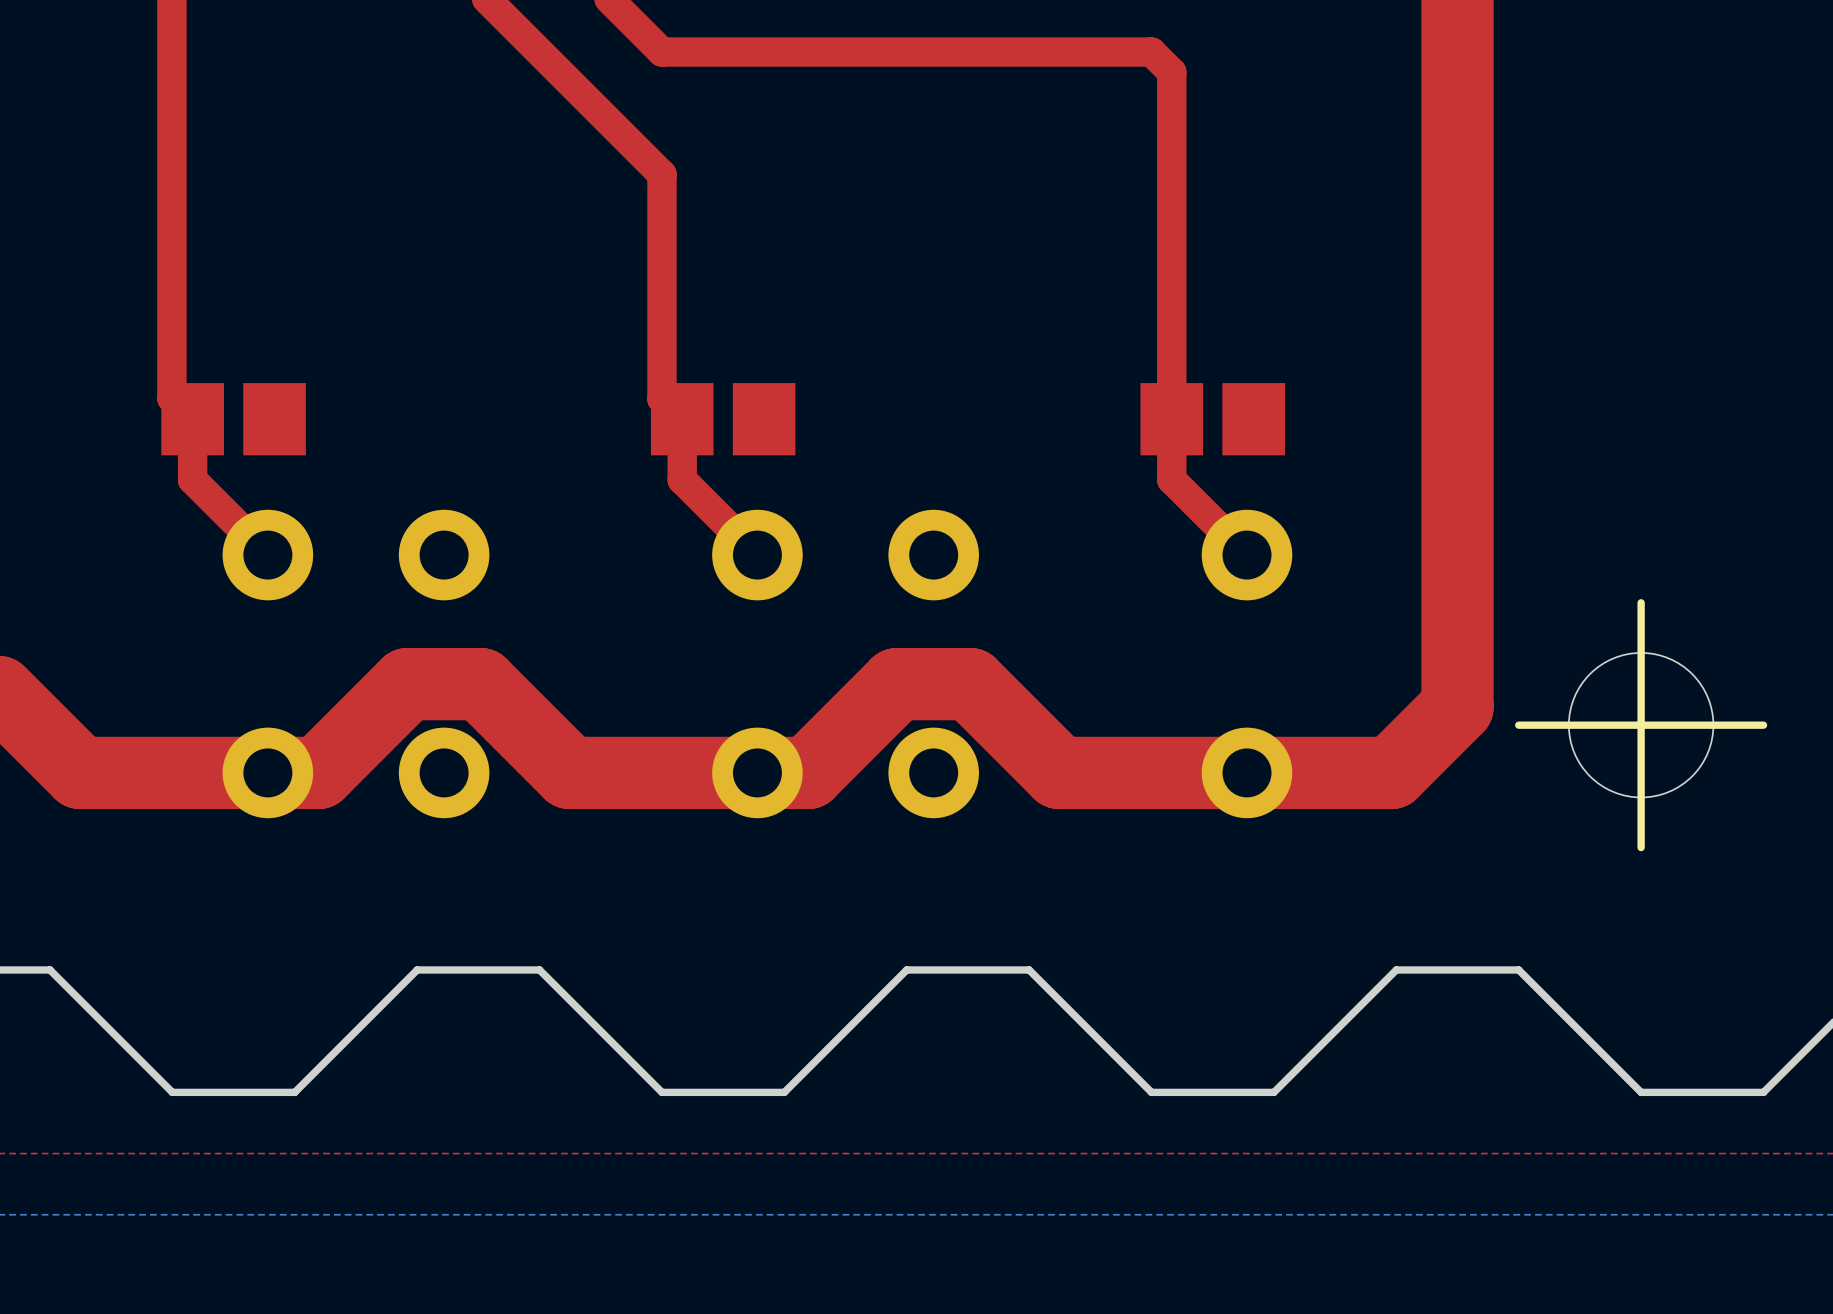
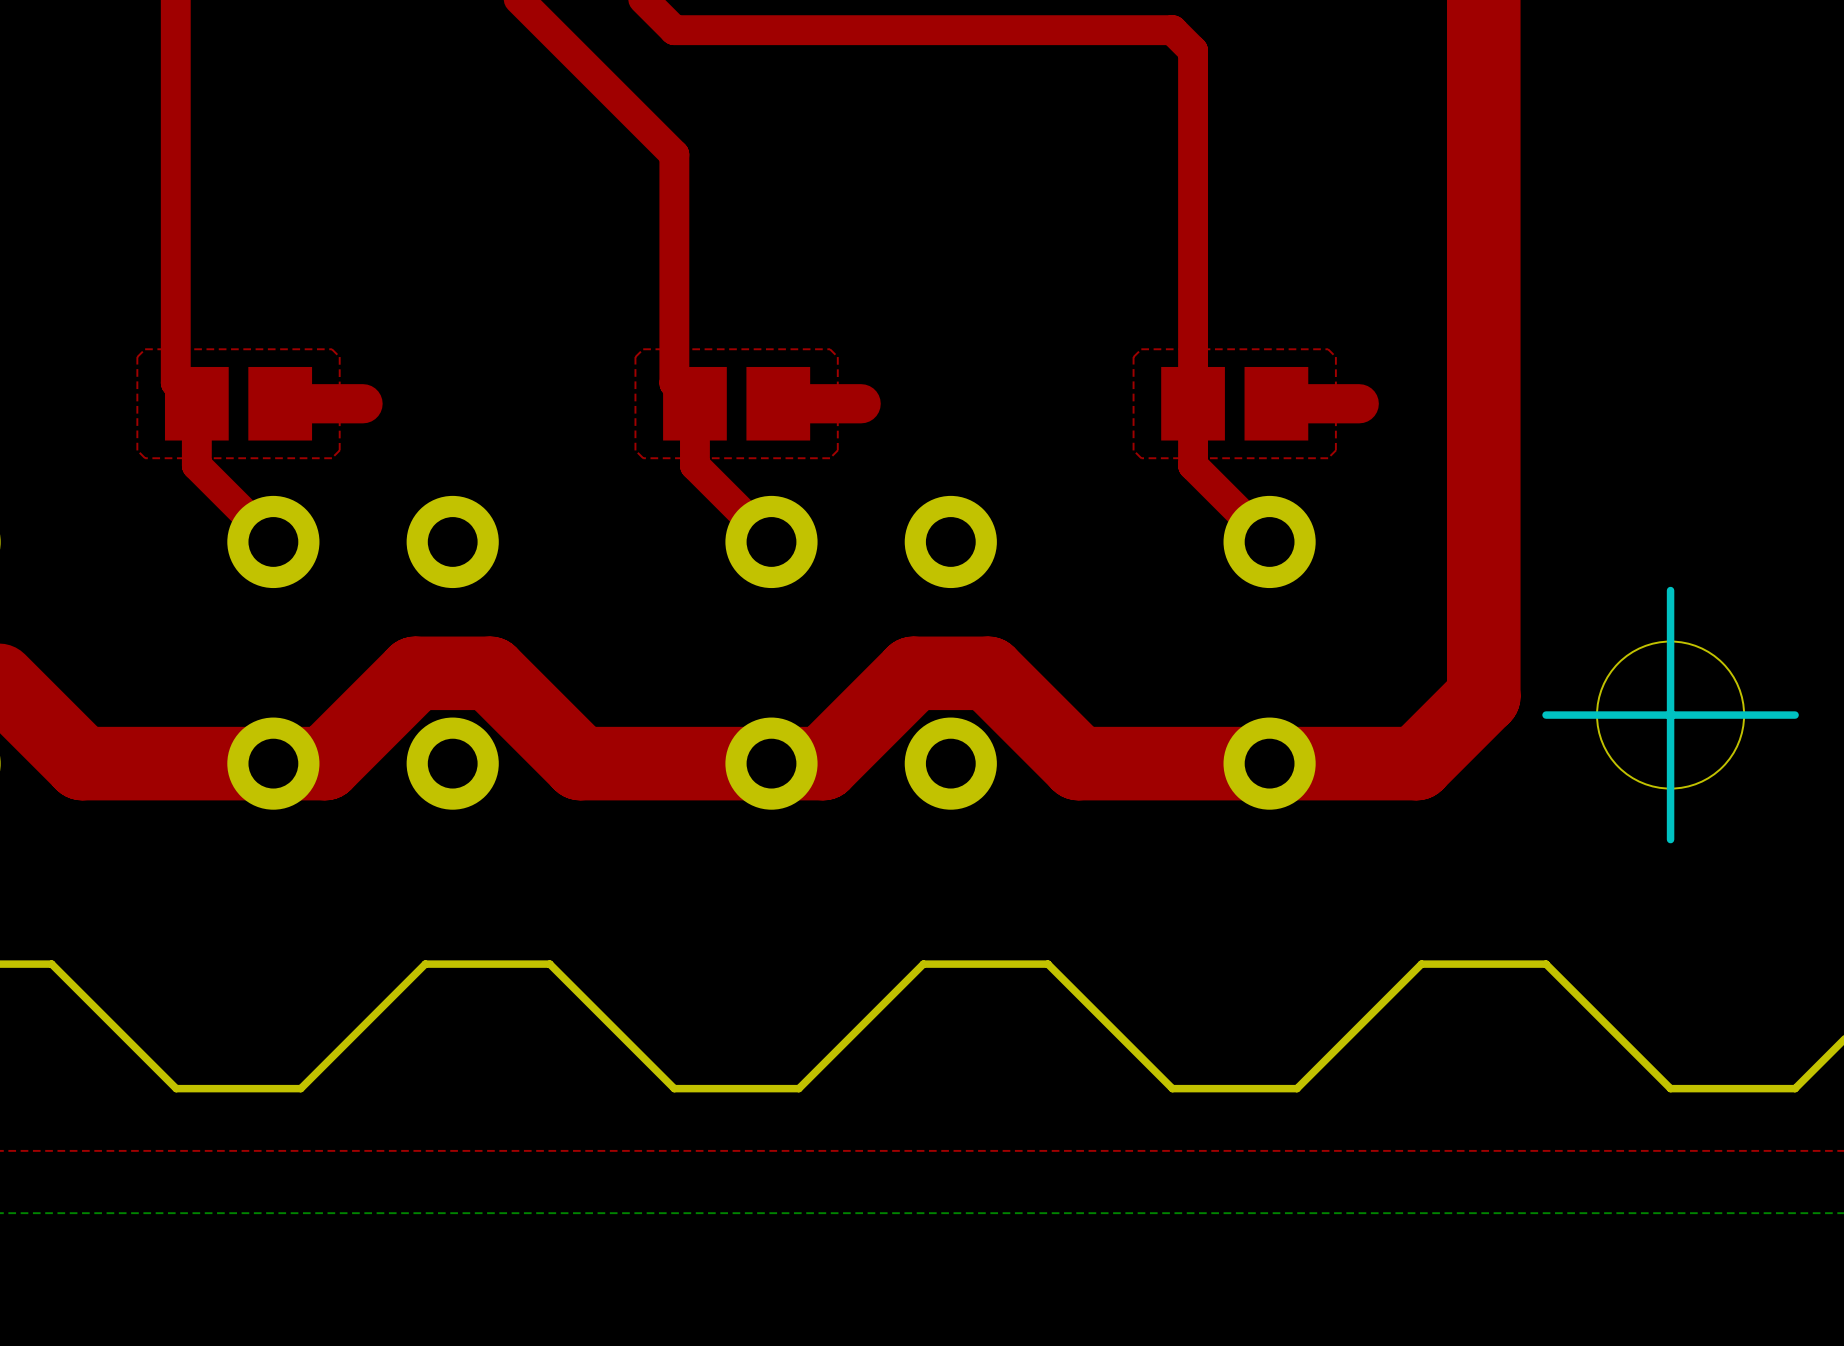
top zone outline: none -> (331, 349) (145, 349) (137, 357) (137, 450) (145, 458) (331, 458) (339, 450) (339, 357) (331, 349)
top zone outline: none -> (830, 349) (643, 349) (635, 357) (635, 450) (643, 458) (830, 458) (837, 450) (837, 357) (830, 349)
top zone outline: none -> (1328, 349) (1141, 349) (1133, 357) (1133, 450) (1141, 458) (1328, 458) (1335, 450) (1335, 357) (1328, 349)
top track: none -> (363, 403) (280, 403)
top track: none -> (861, 403) (778, 403)
top track: none -> (1359, 403) (1276, 403)

